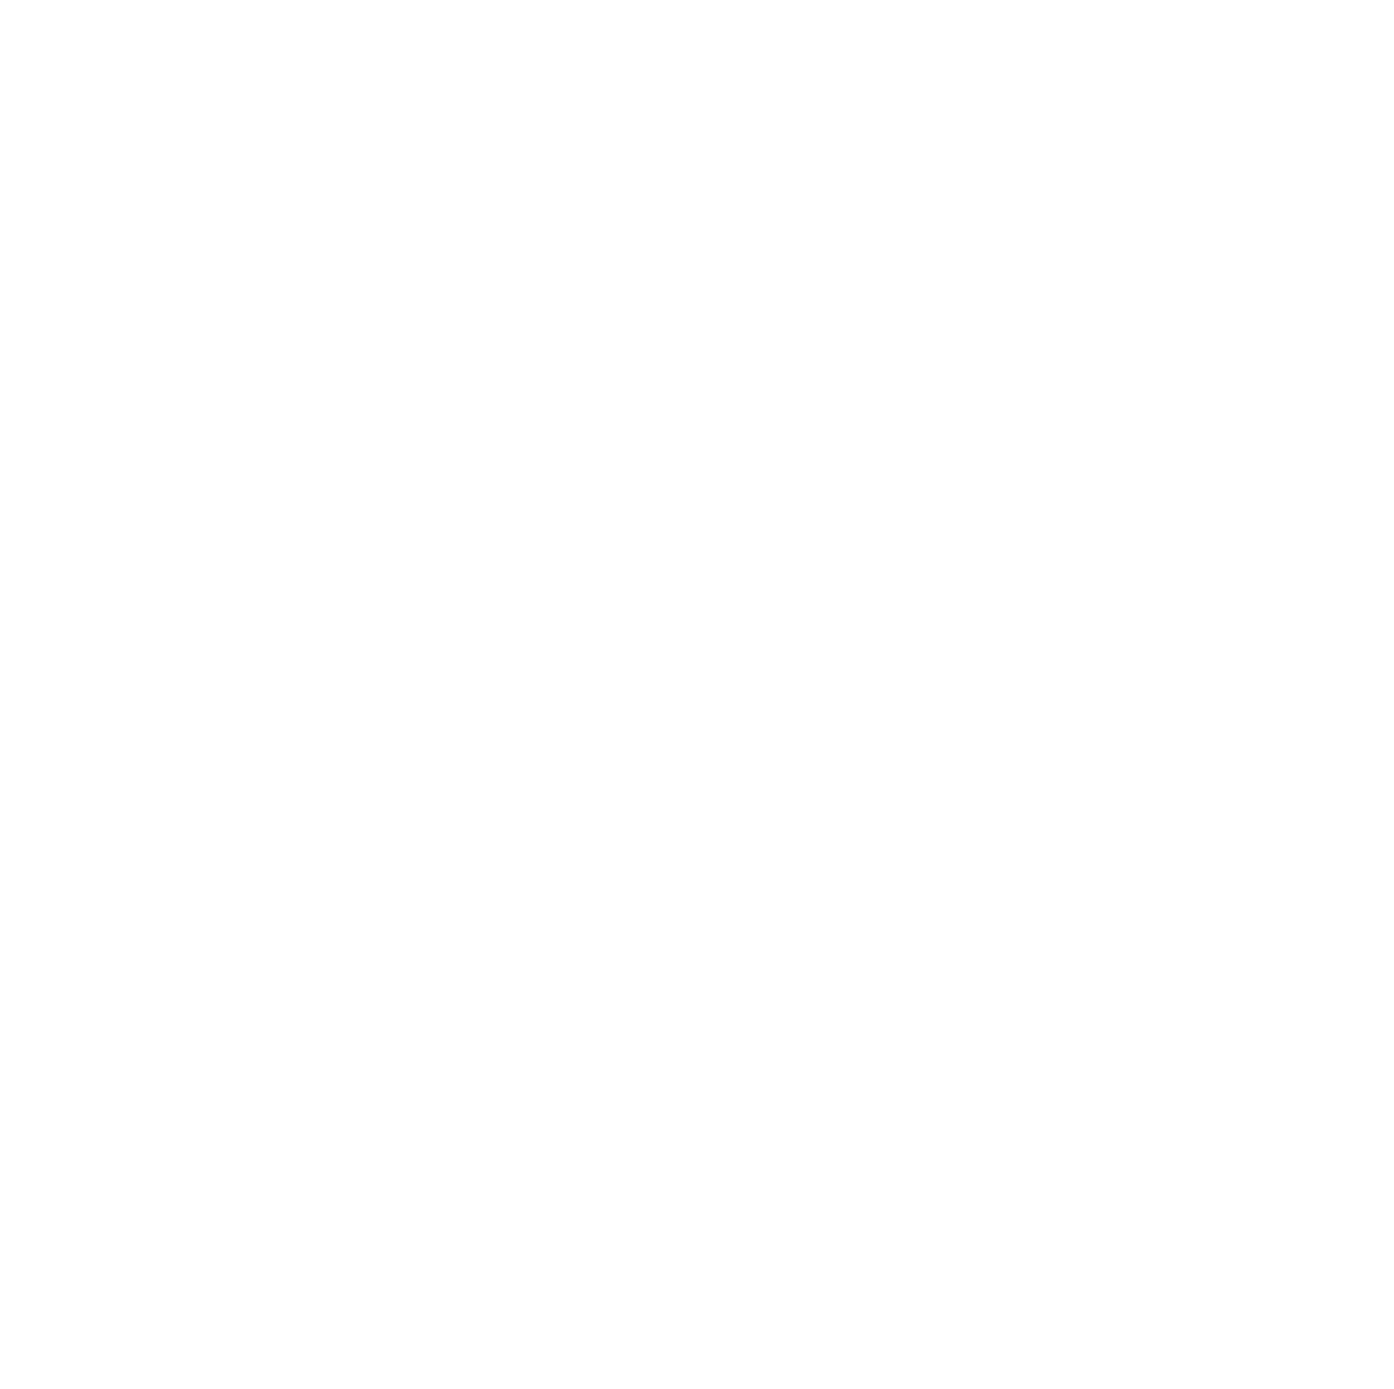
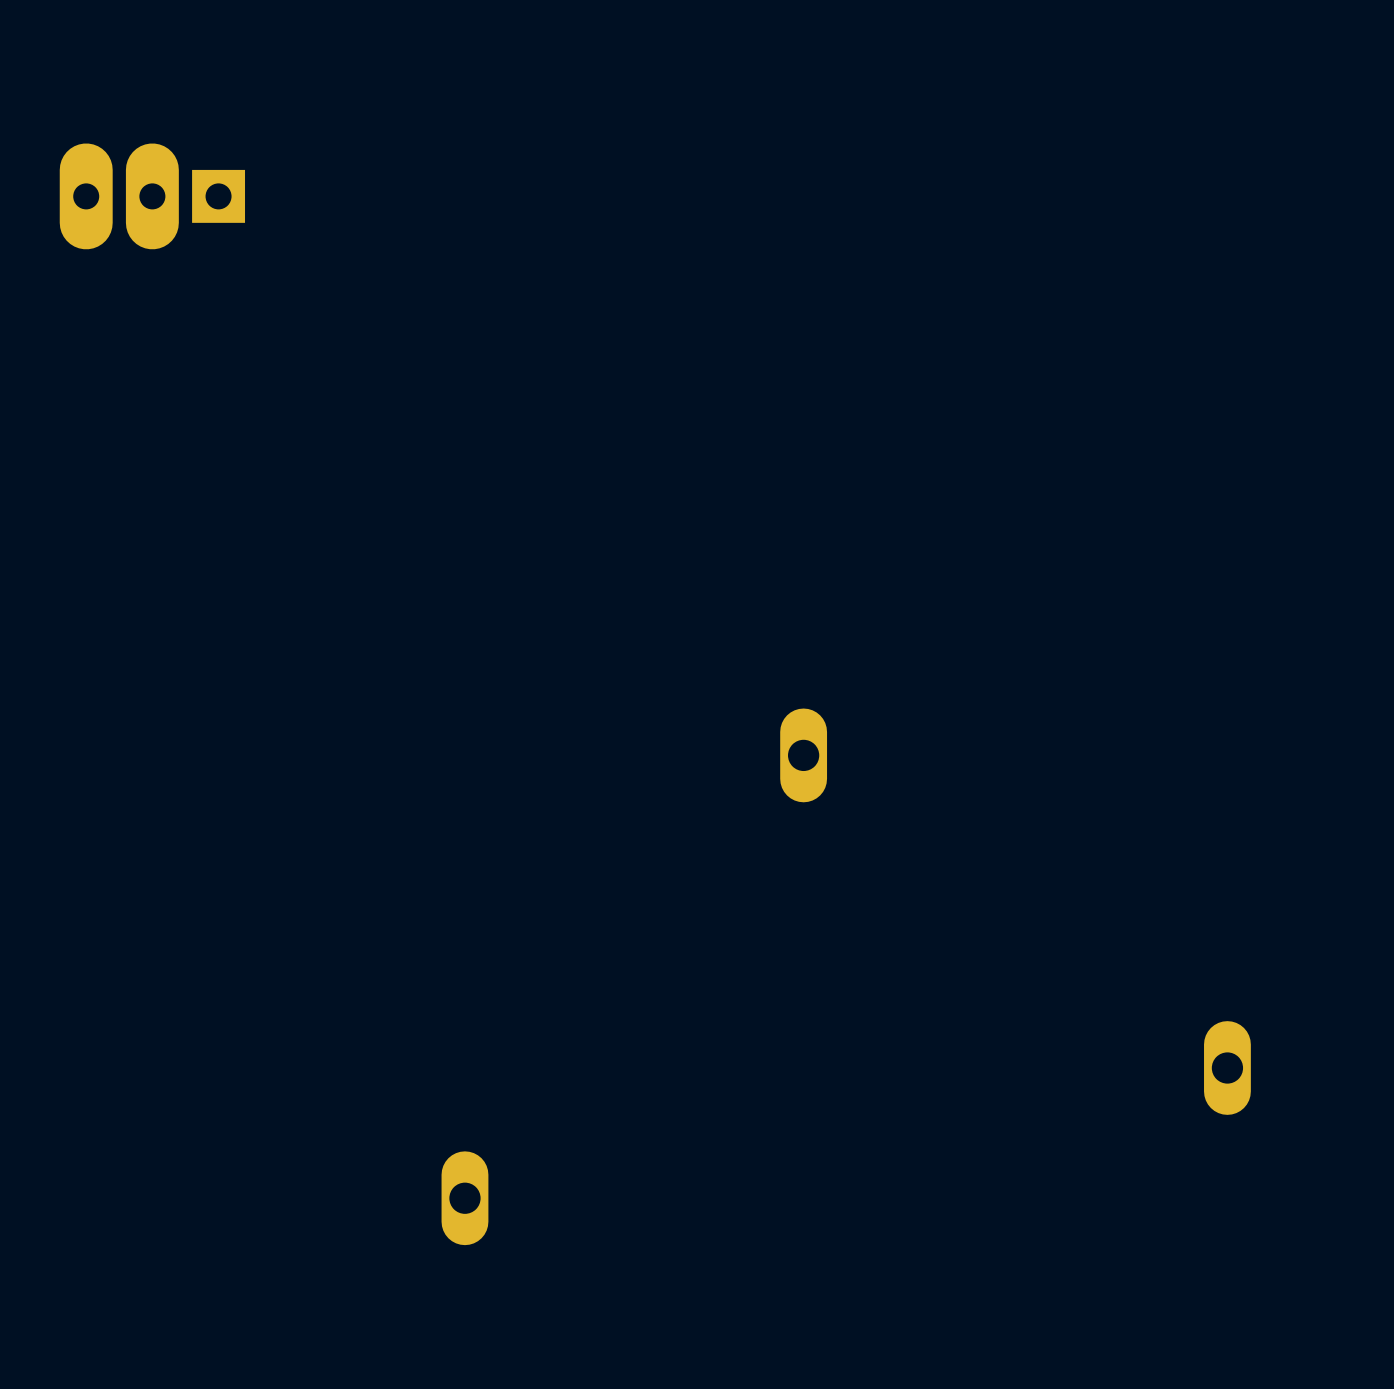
part: none -> (152, 196)
part: none -> (803, 755)
part: none -> (1227, 1068)
part: none -> (464, 1198)

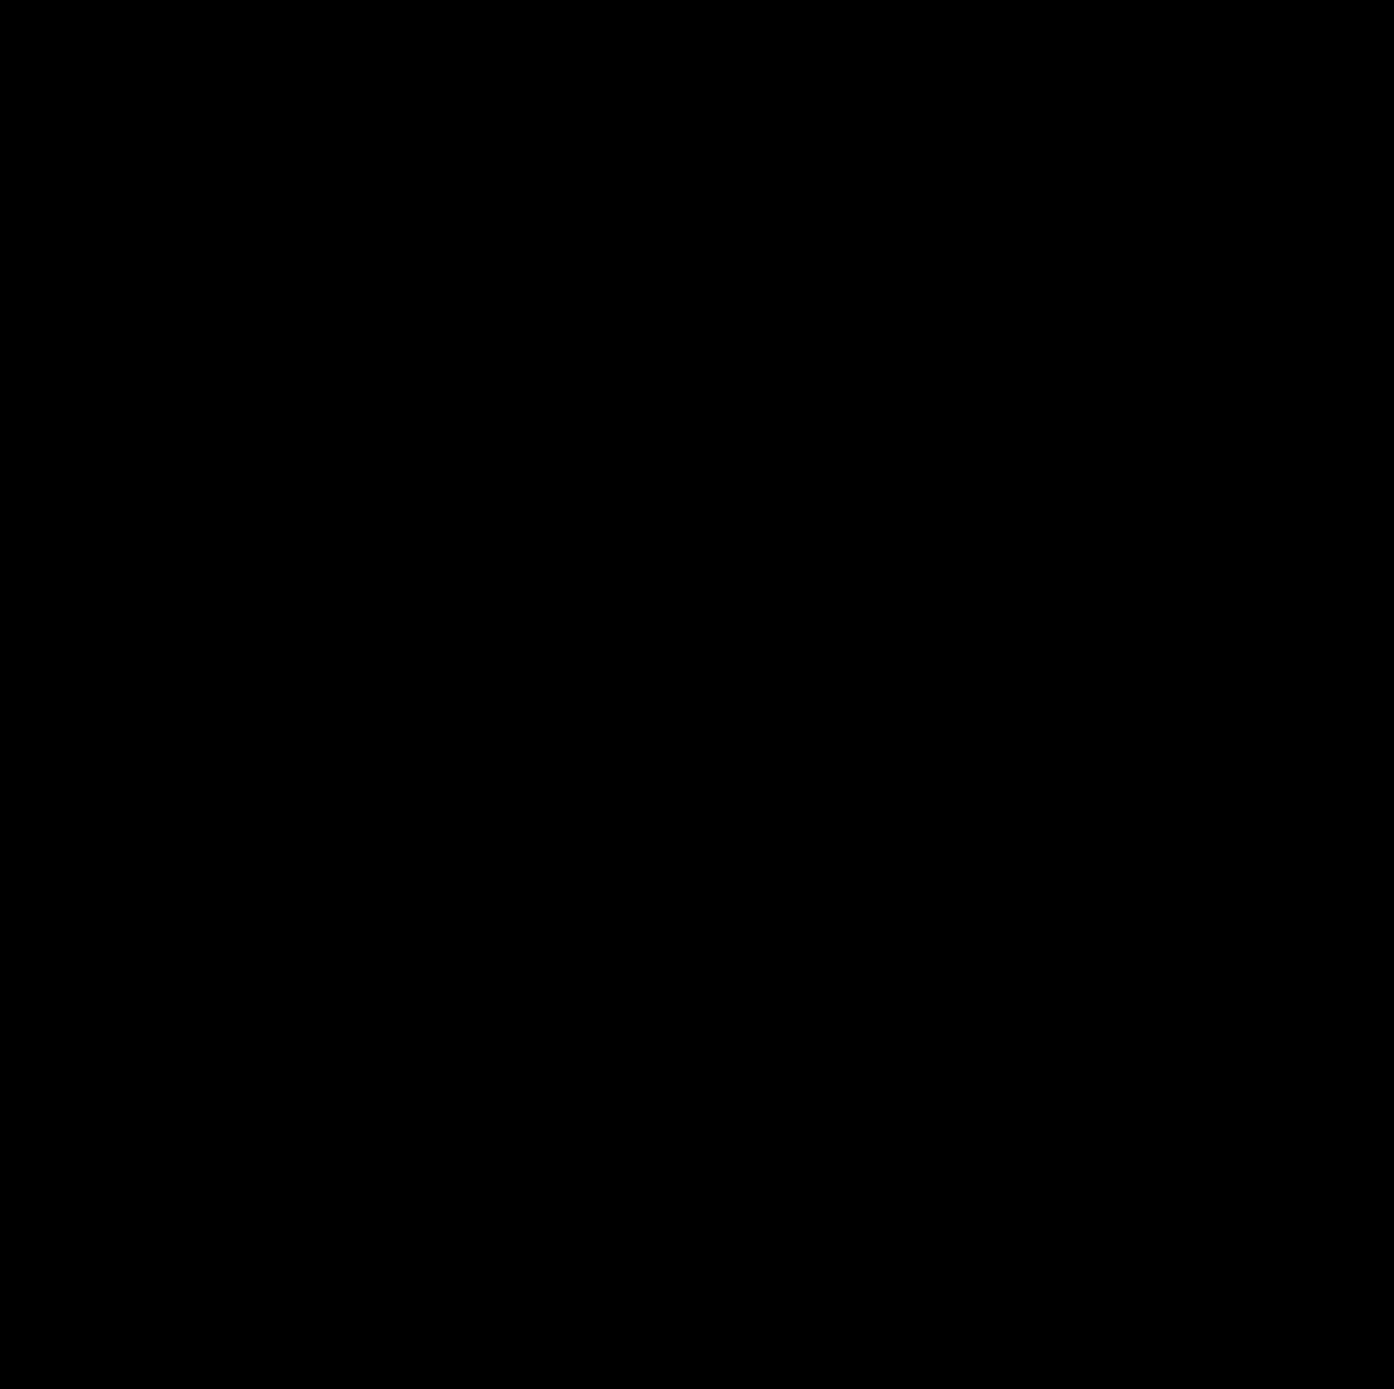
part: (152, 196) -> none
part: (803, 755) -> none
part: (1227, 1068) -> none
part: (464, 1198) -> none

